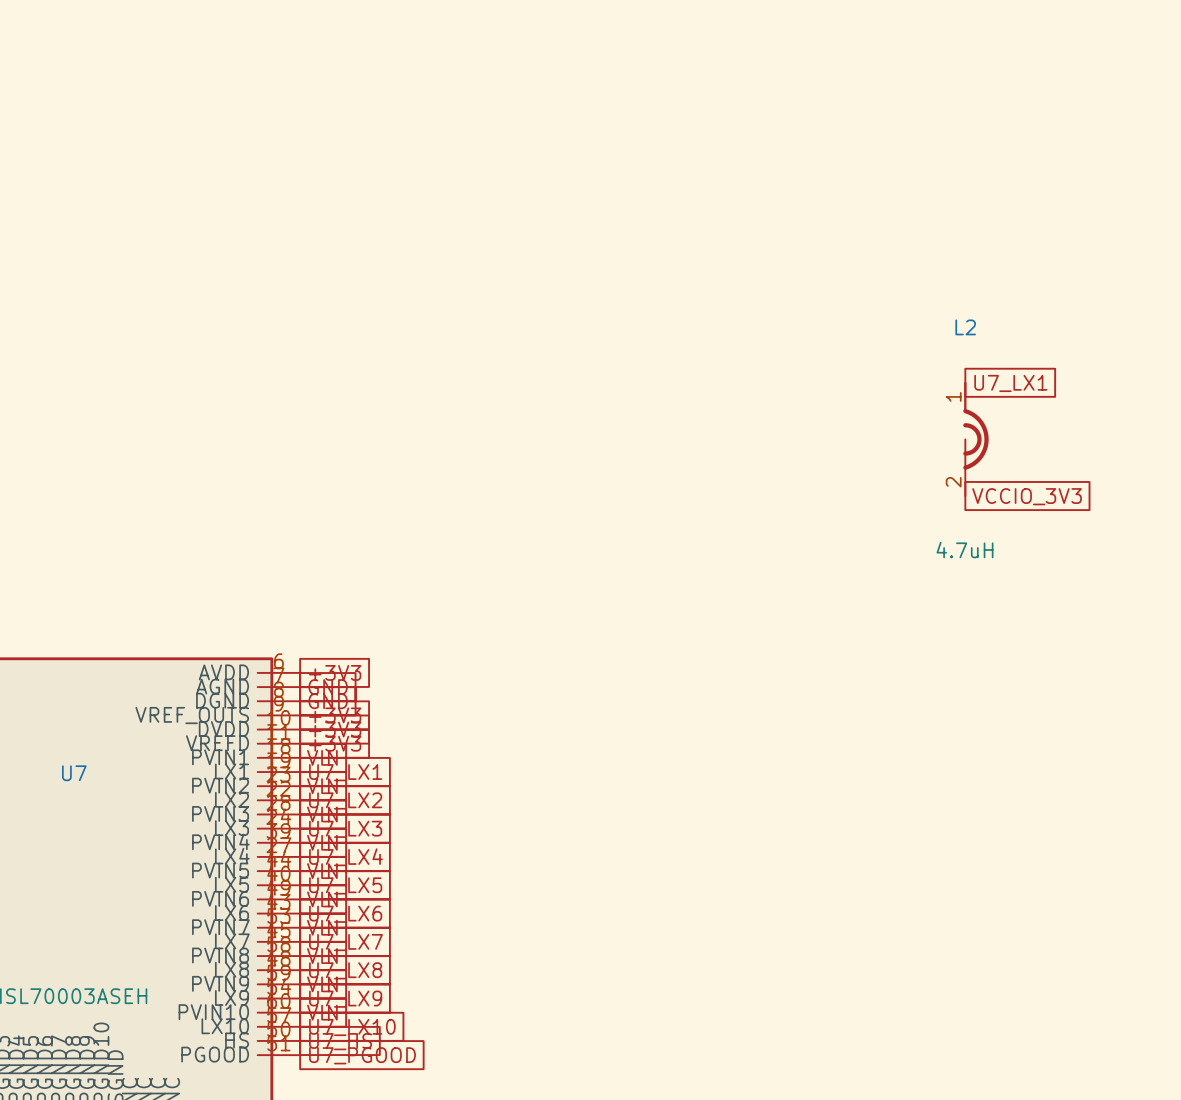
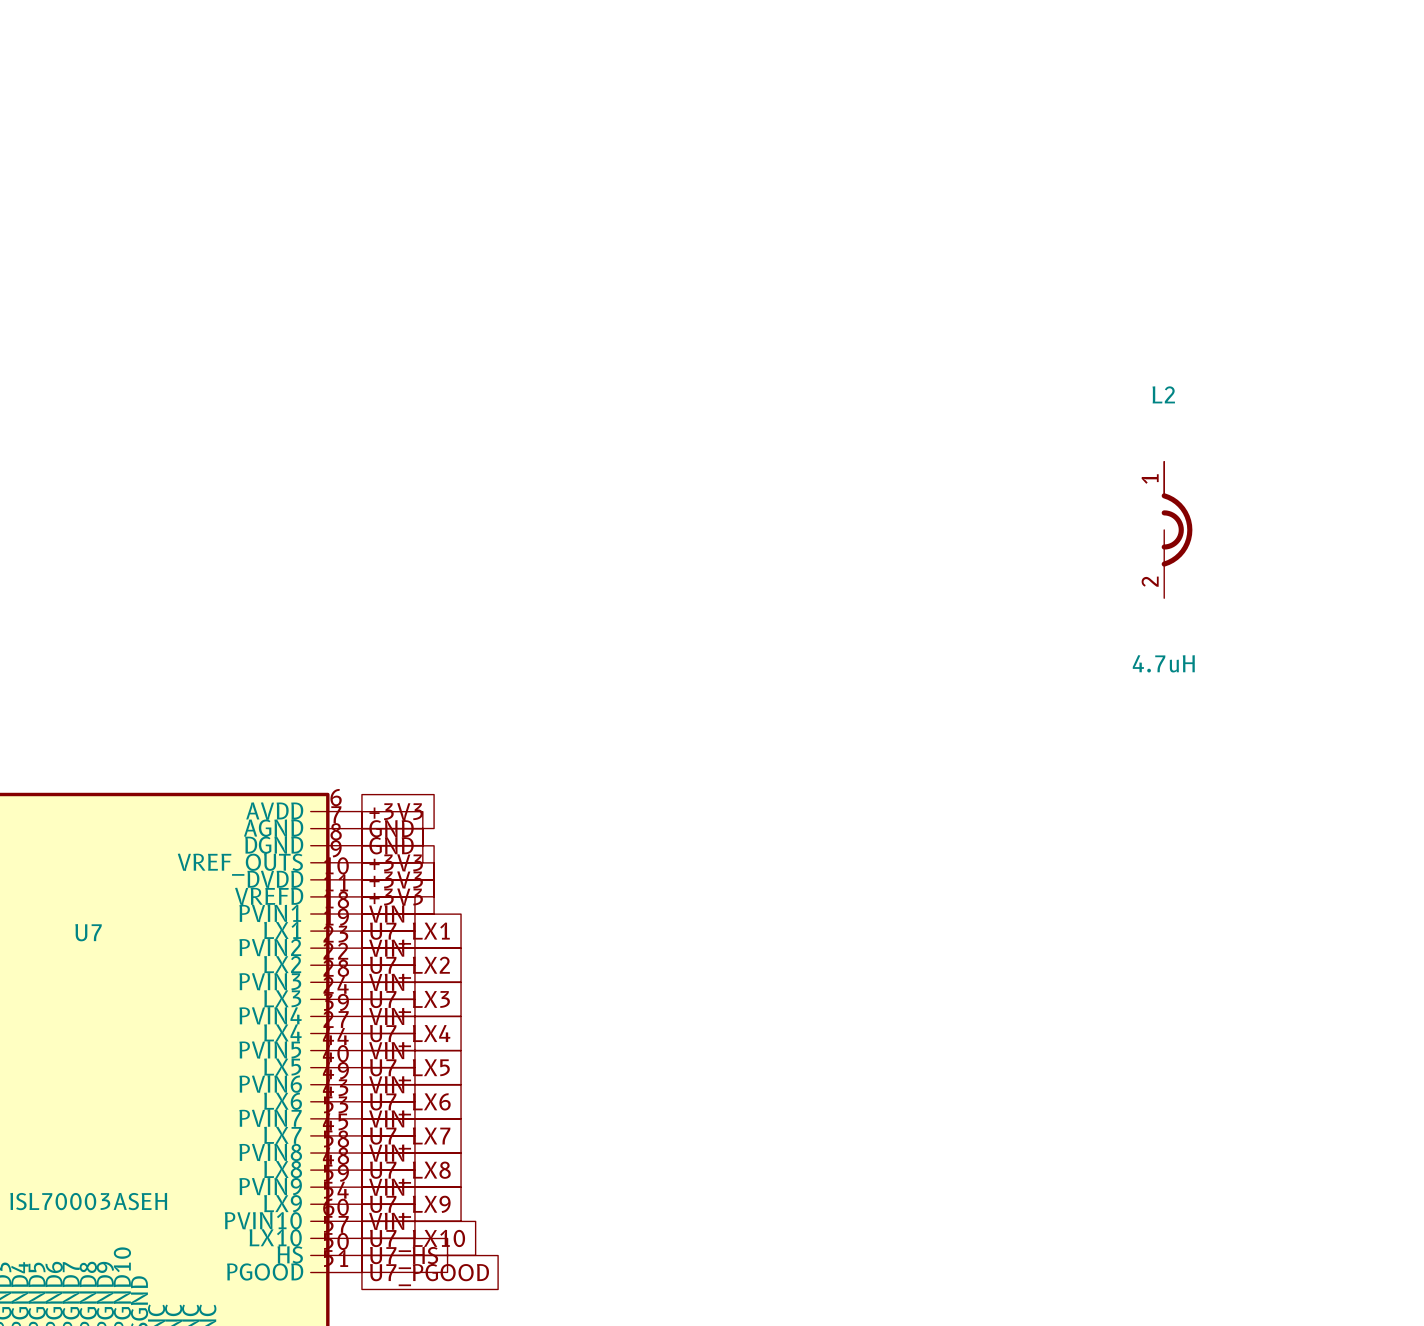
global label: U7_LX1 (1010, 383) -> none
global label: VCCIO_3V3 (1027, 496) -> none

